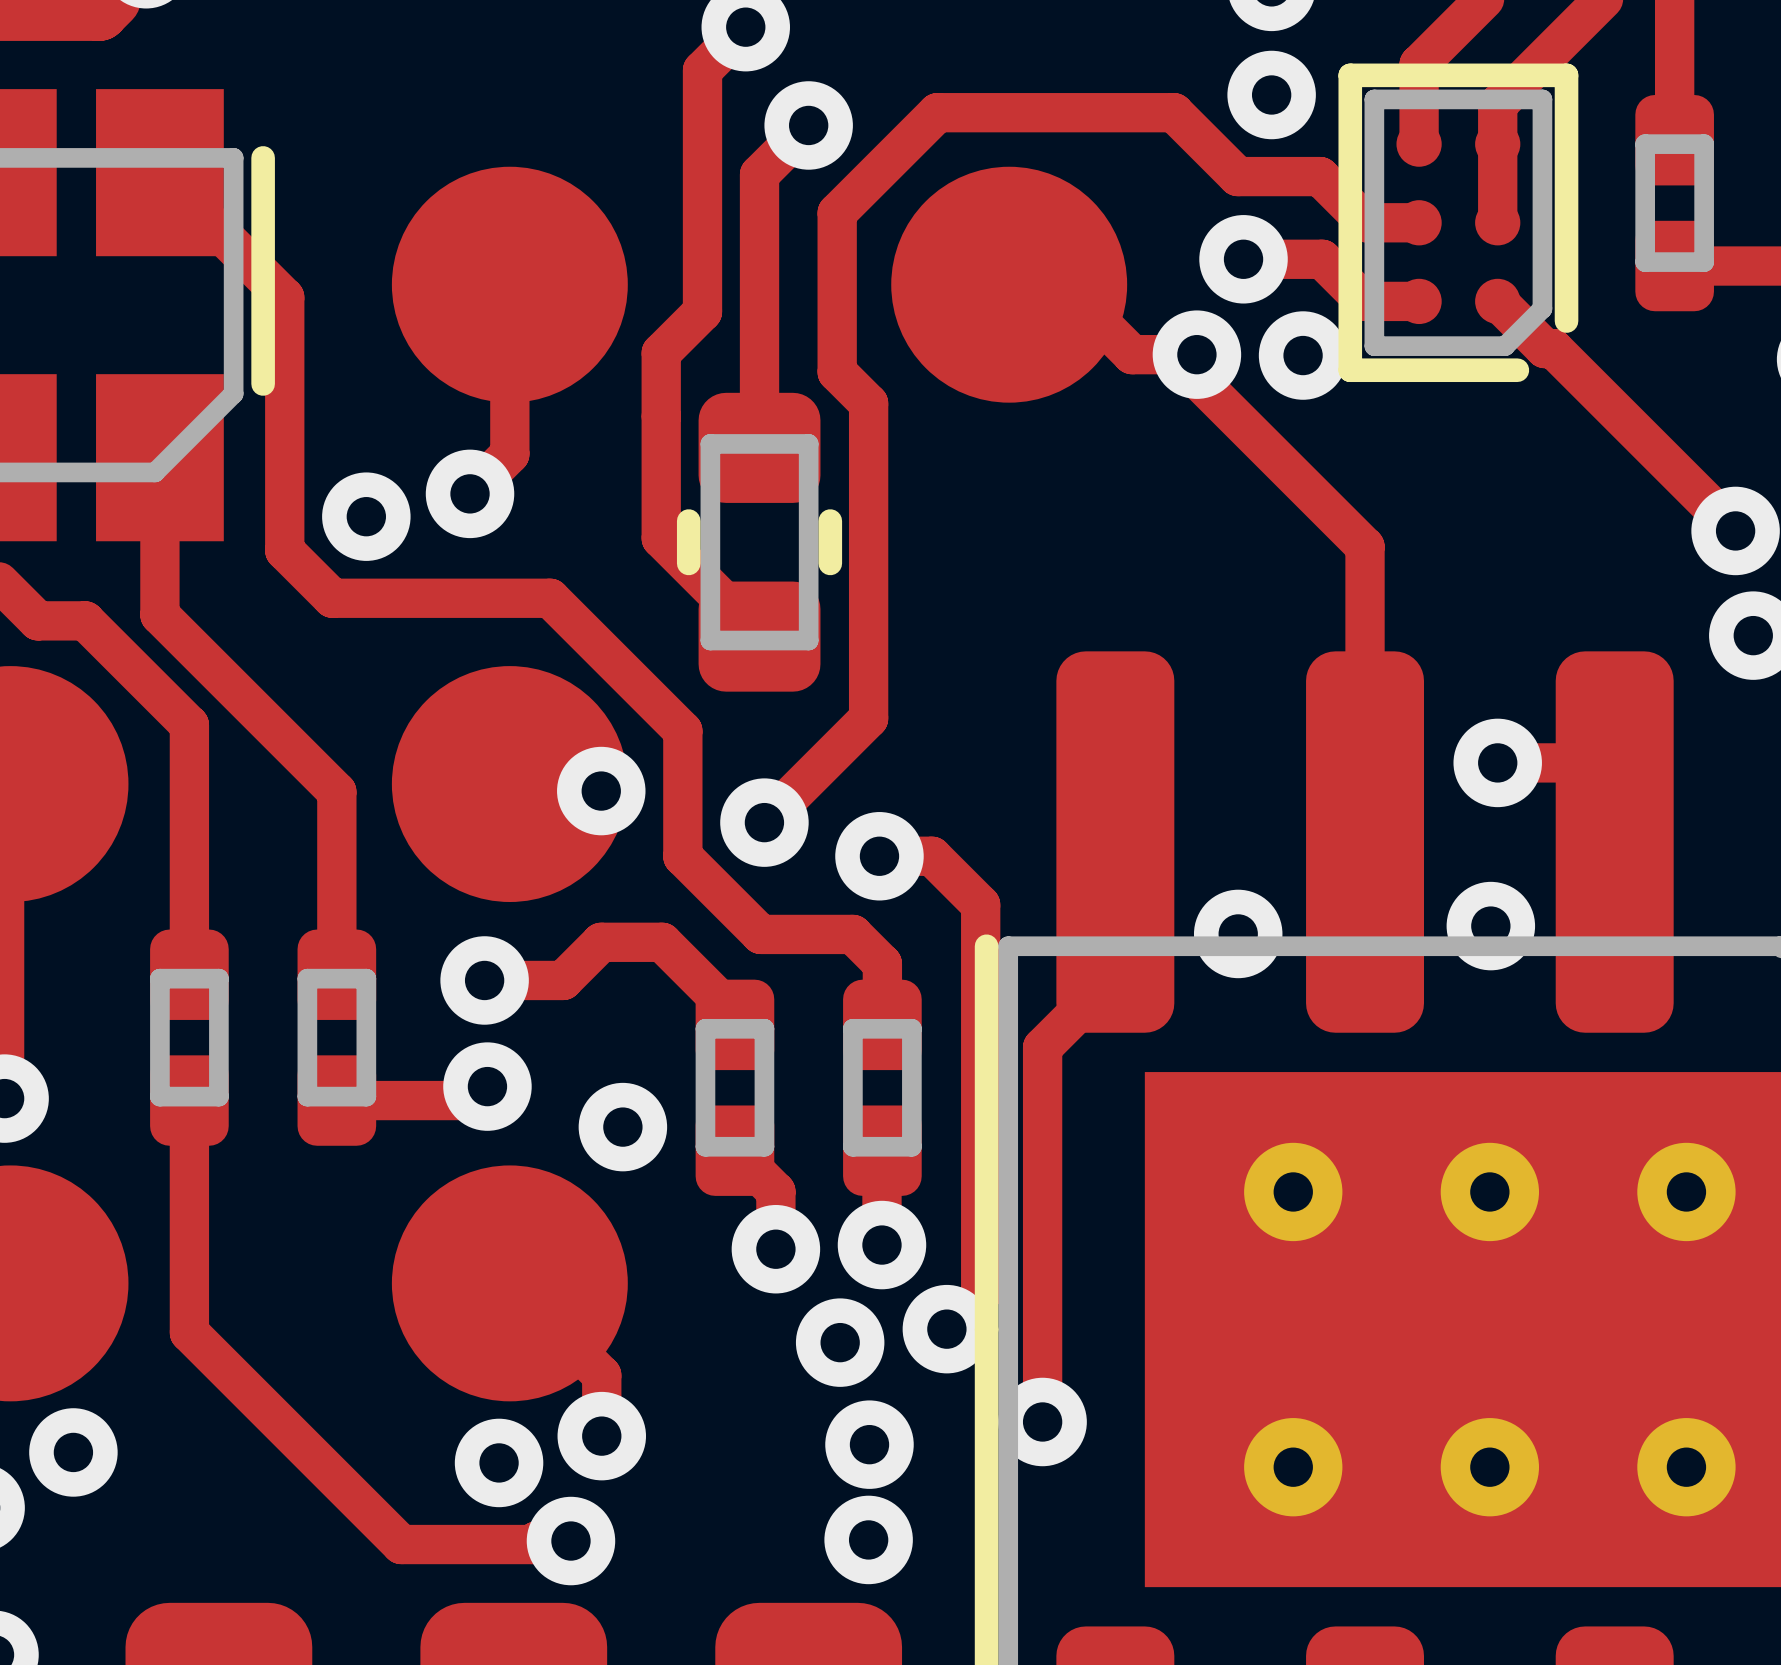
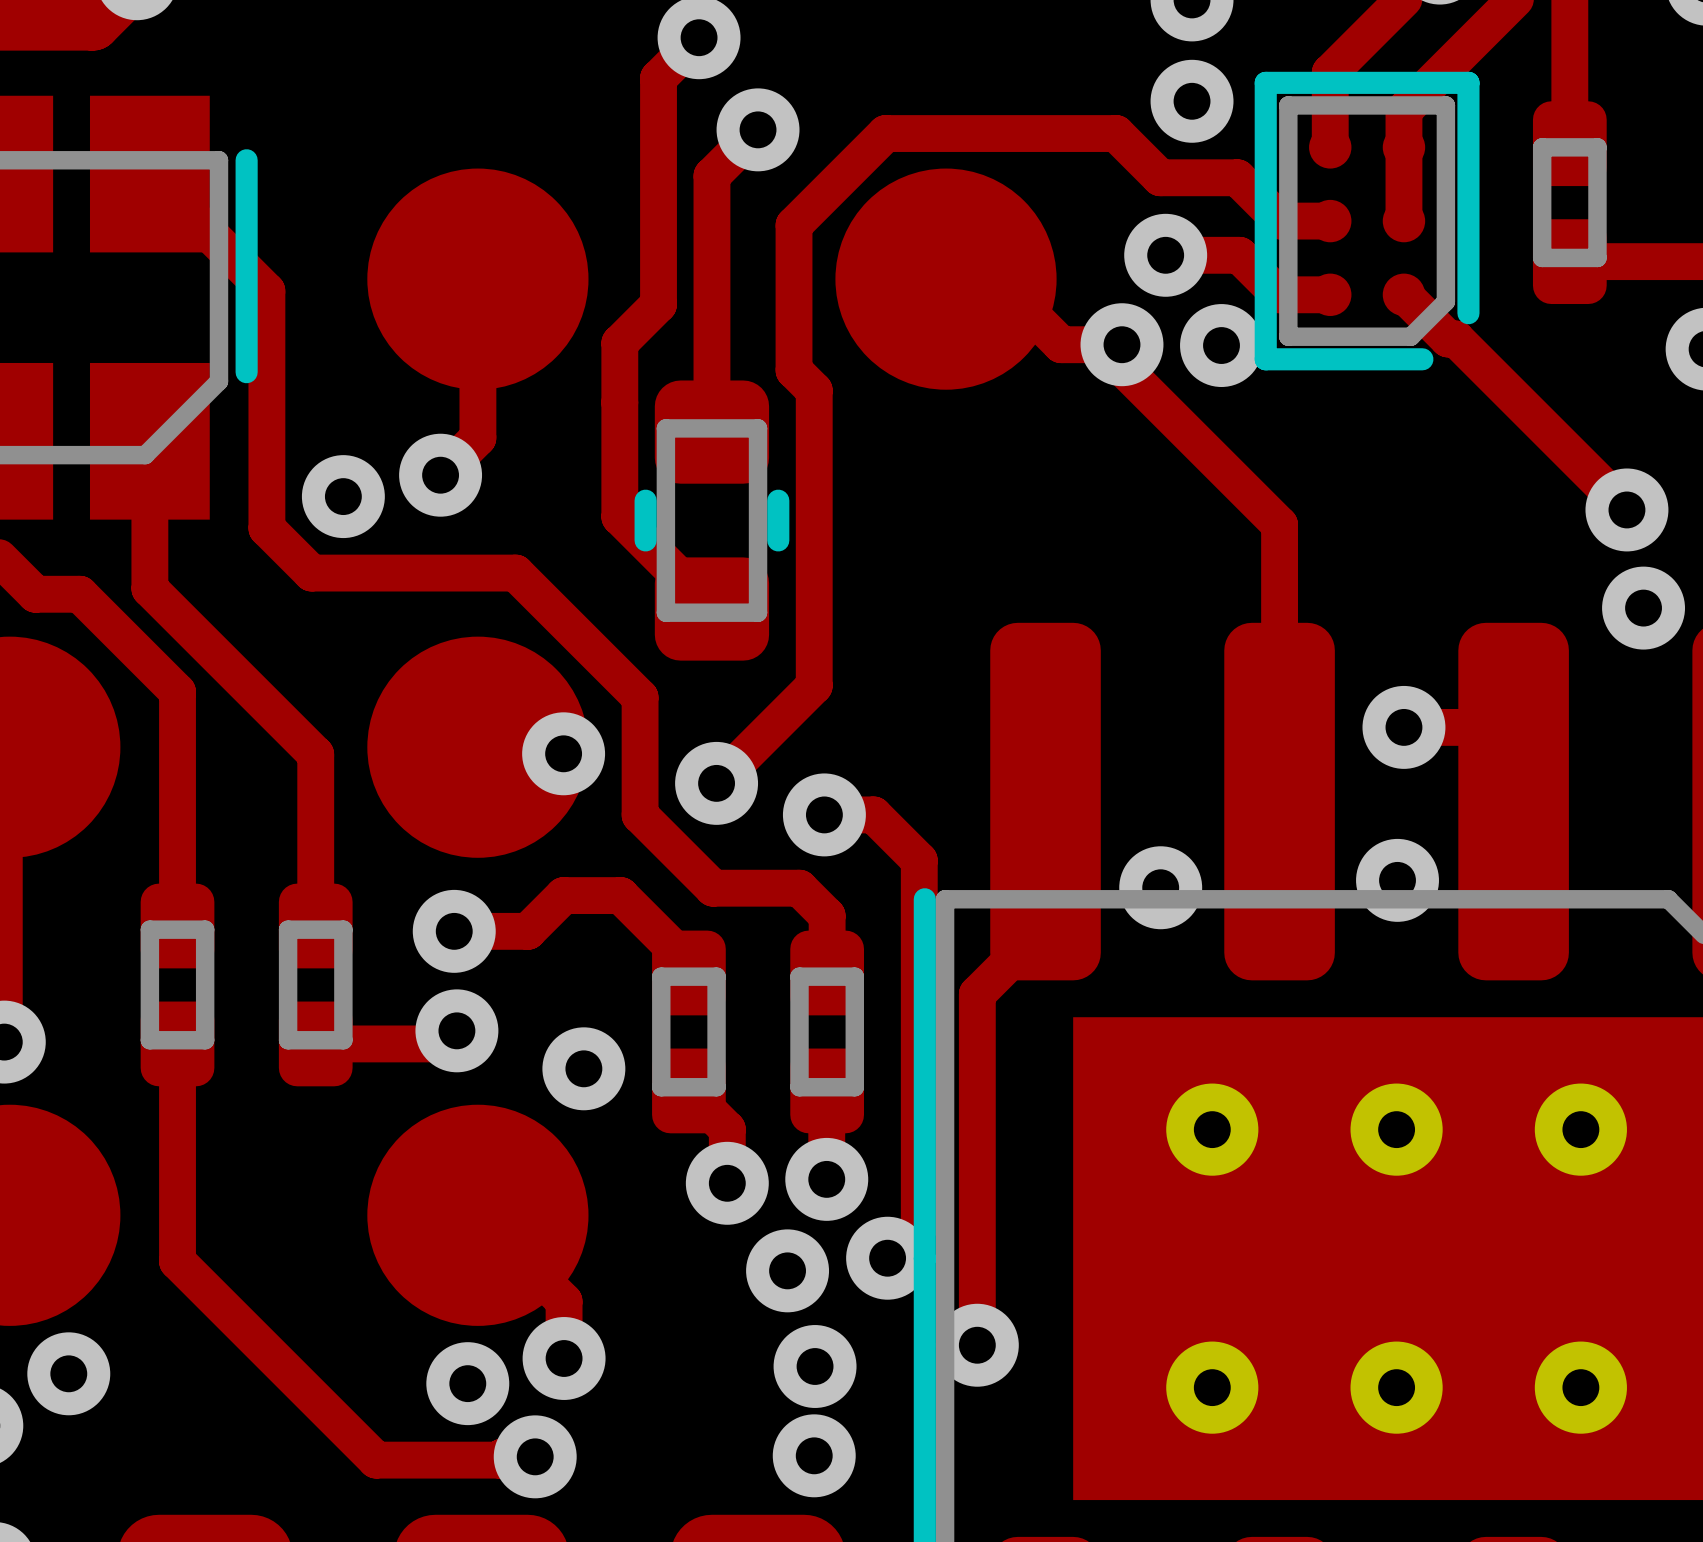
track: (1190, 129) (1173, 112) (937, 112) (837, 212) (837, 372) (847, 381) -> (1116, 133) (885, 133) (794, 225) (794, 370)

